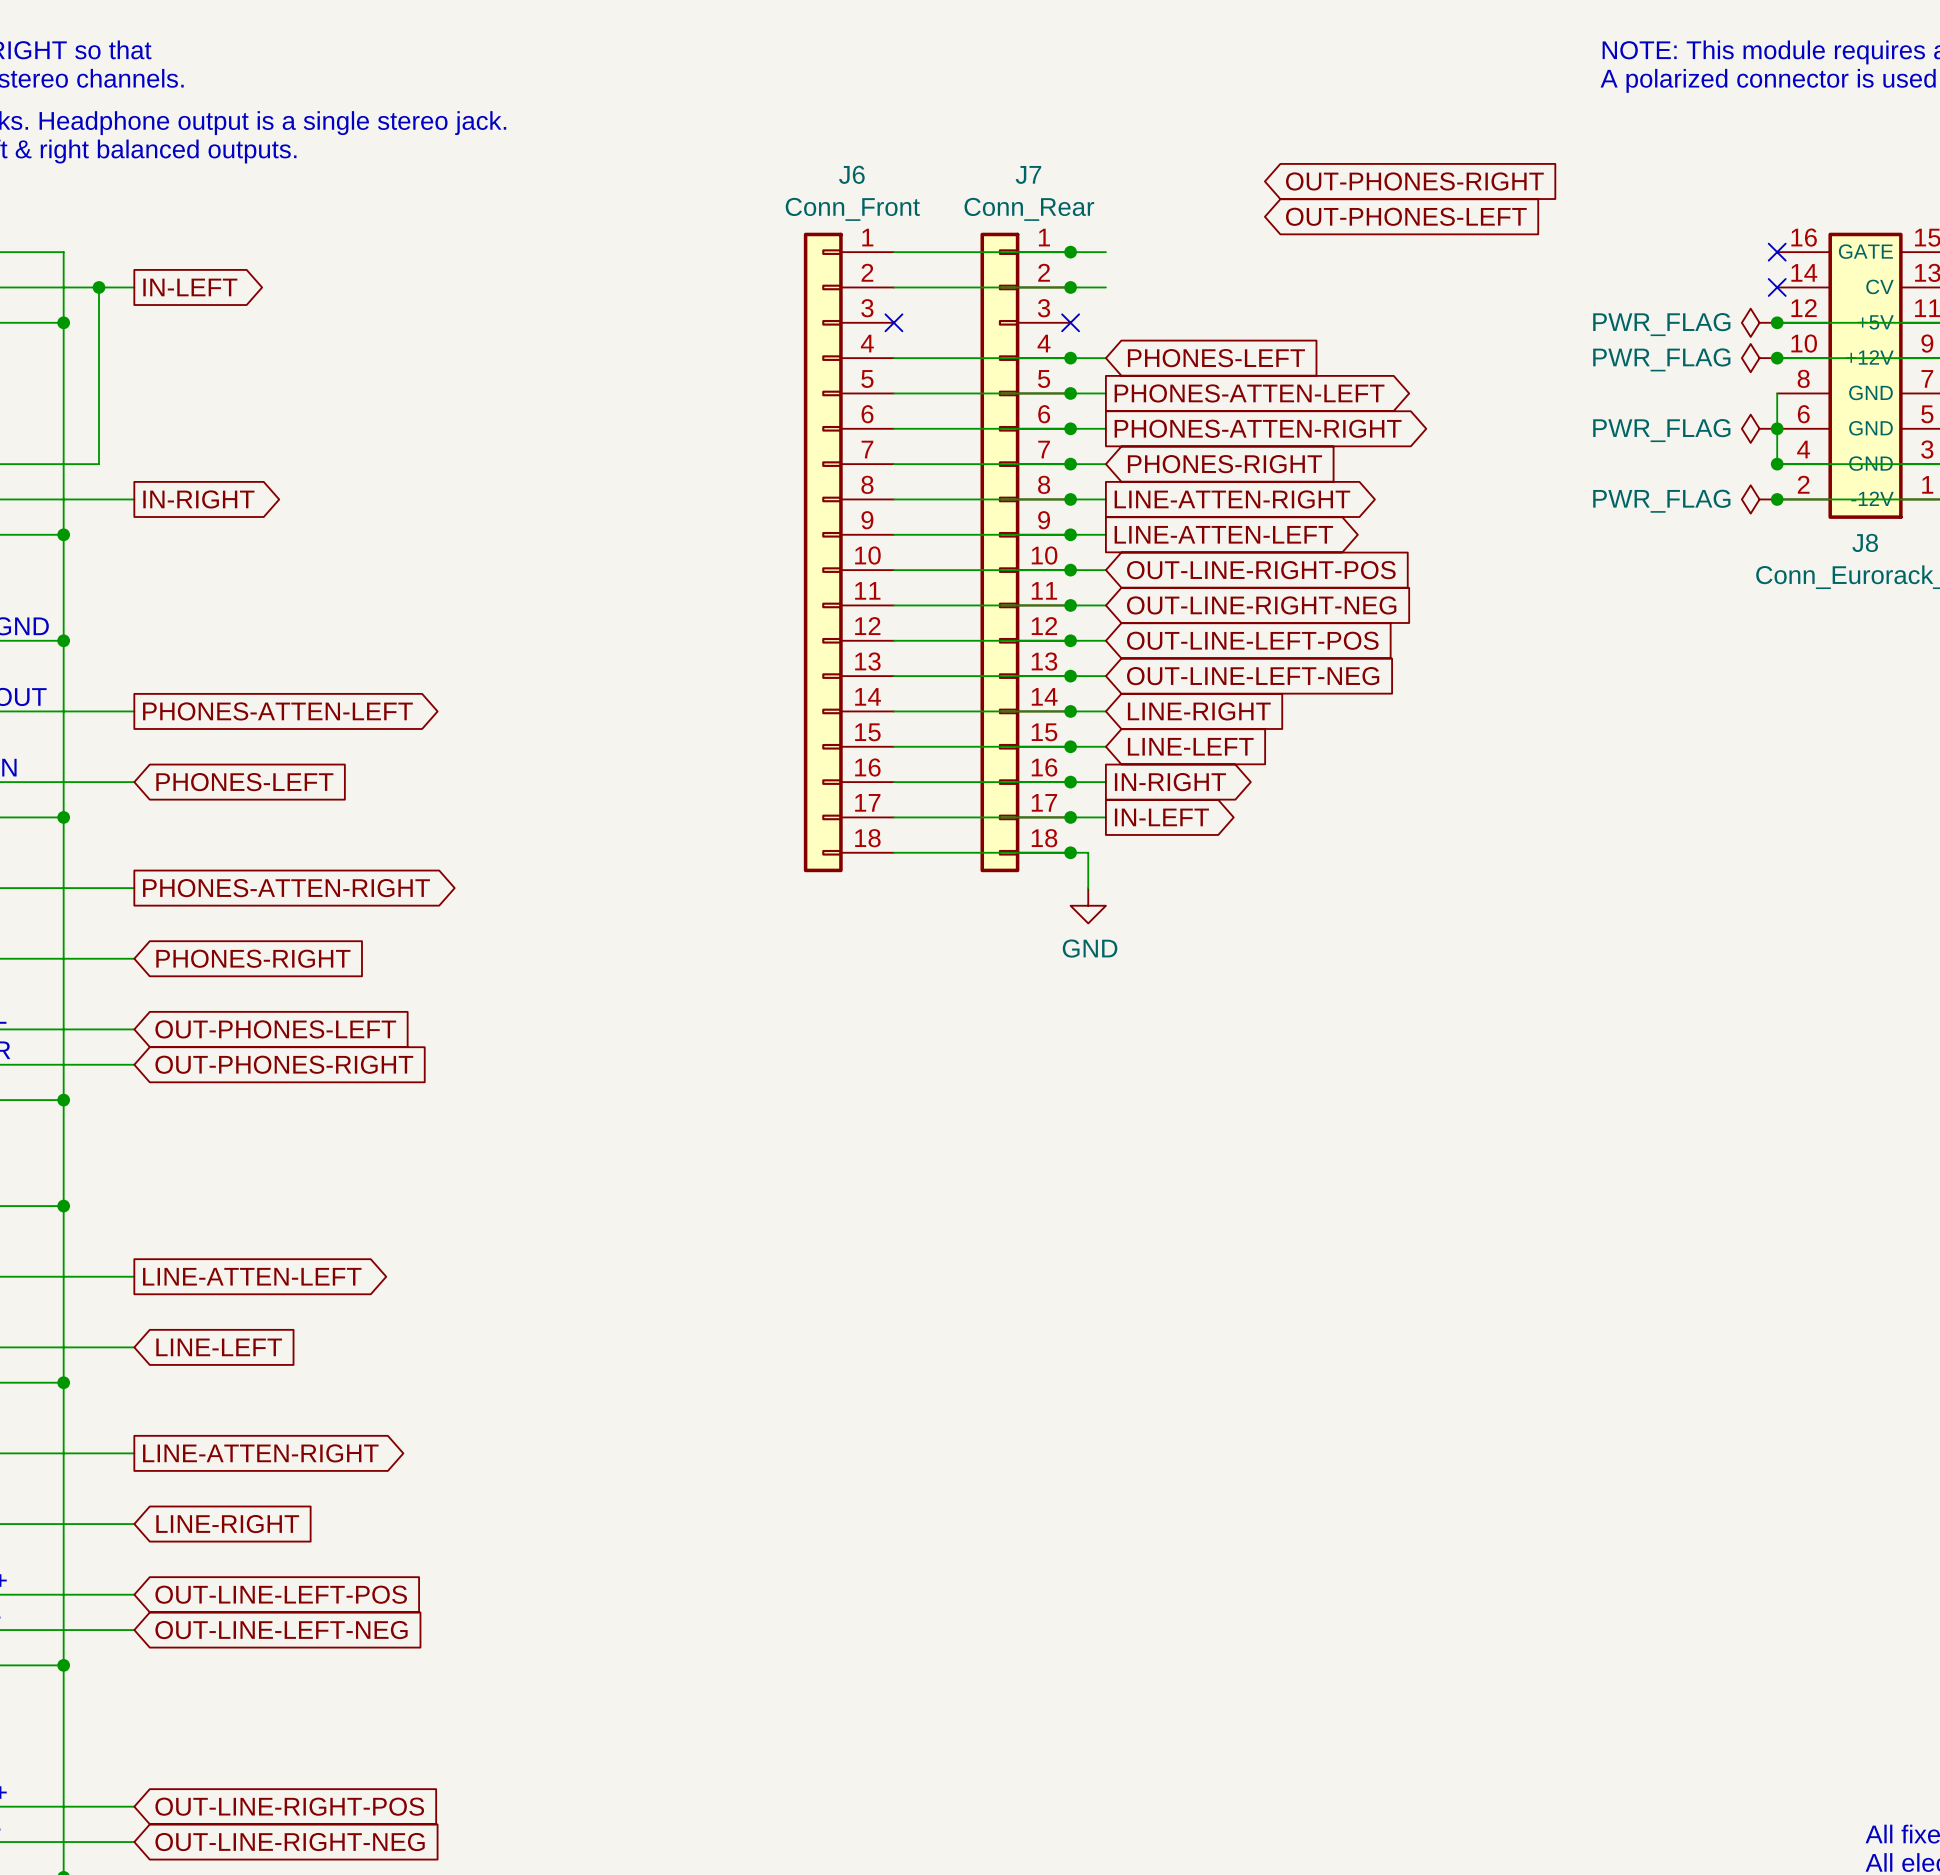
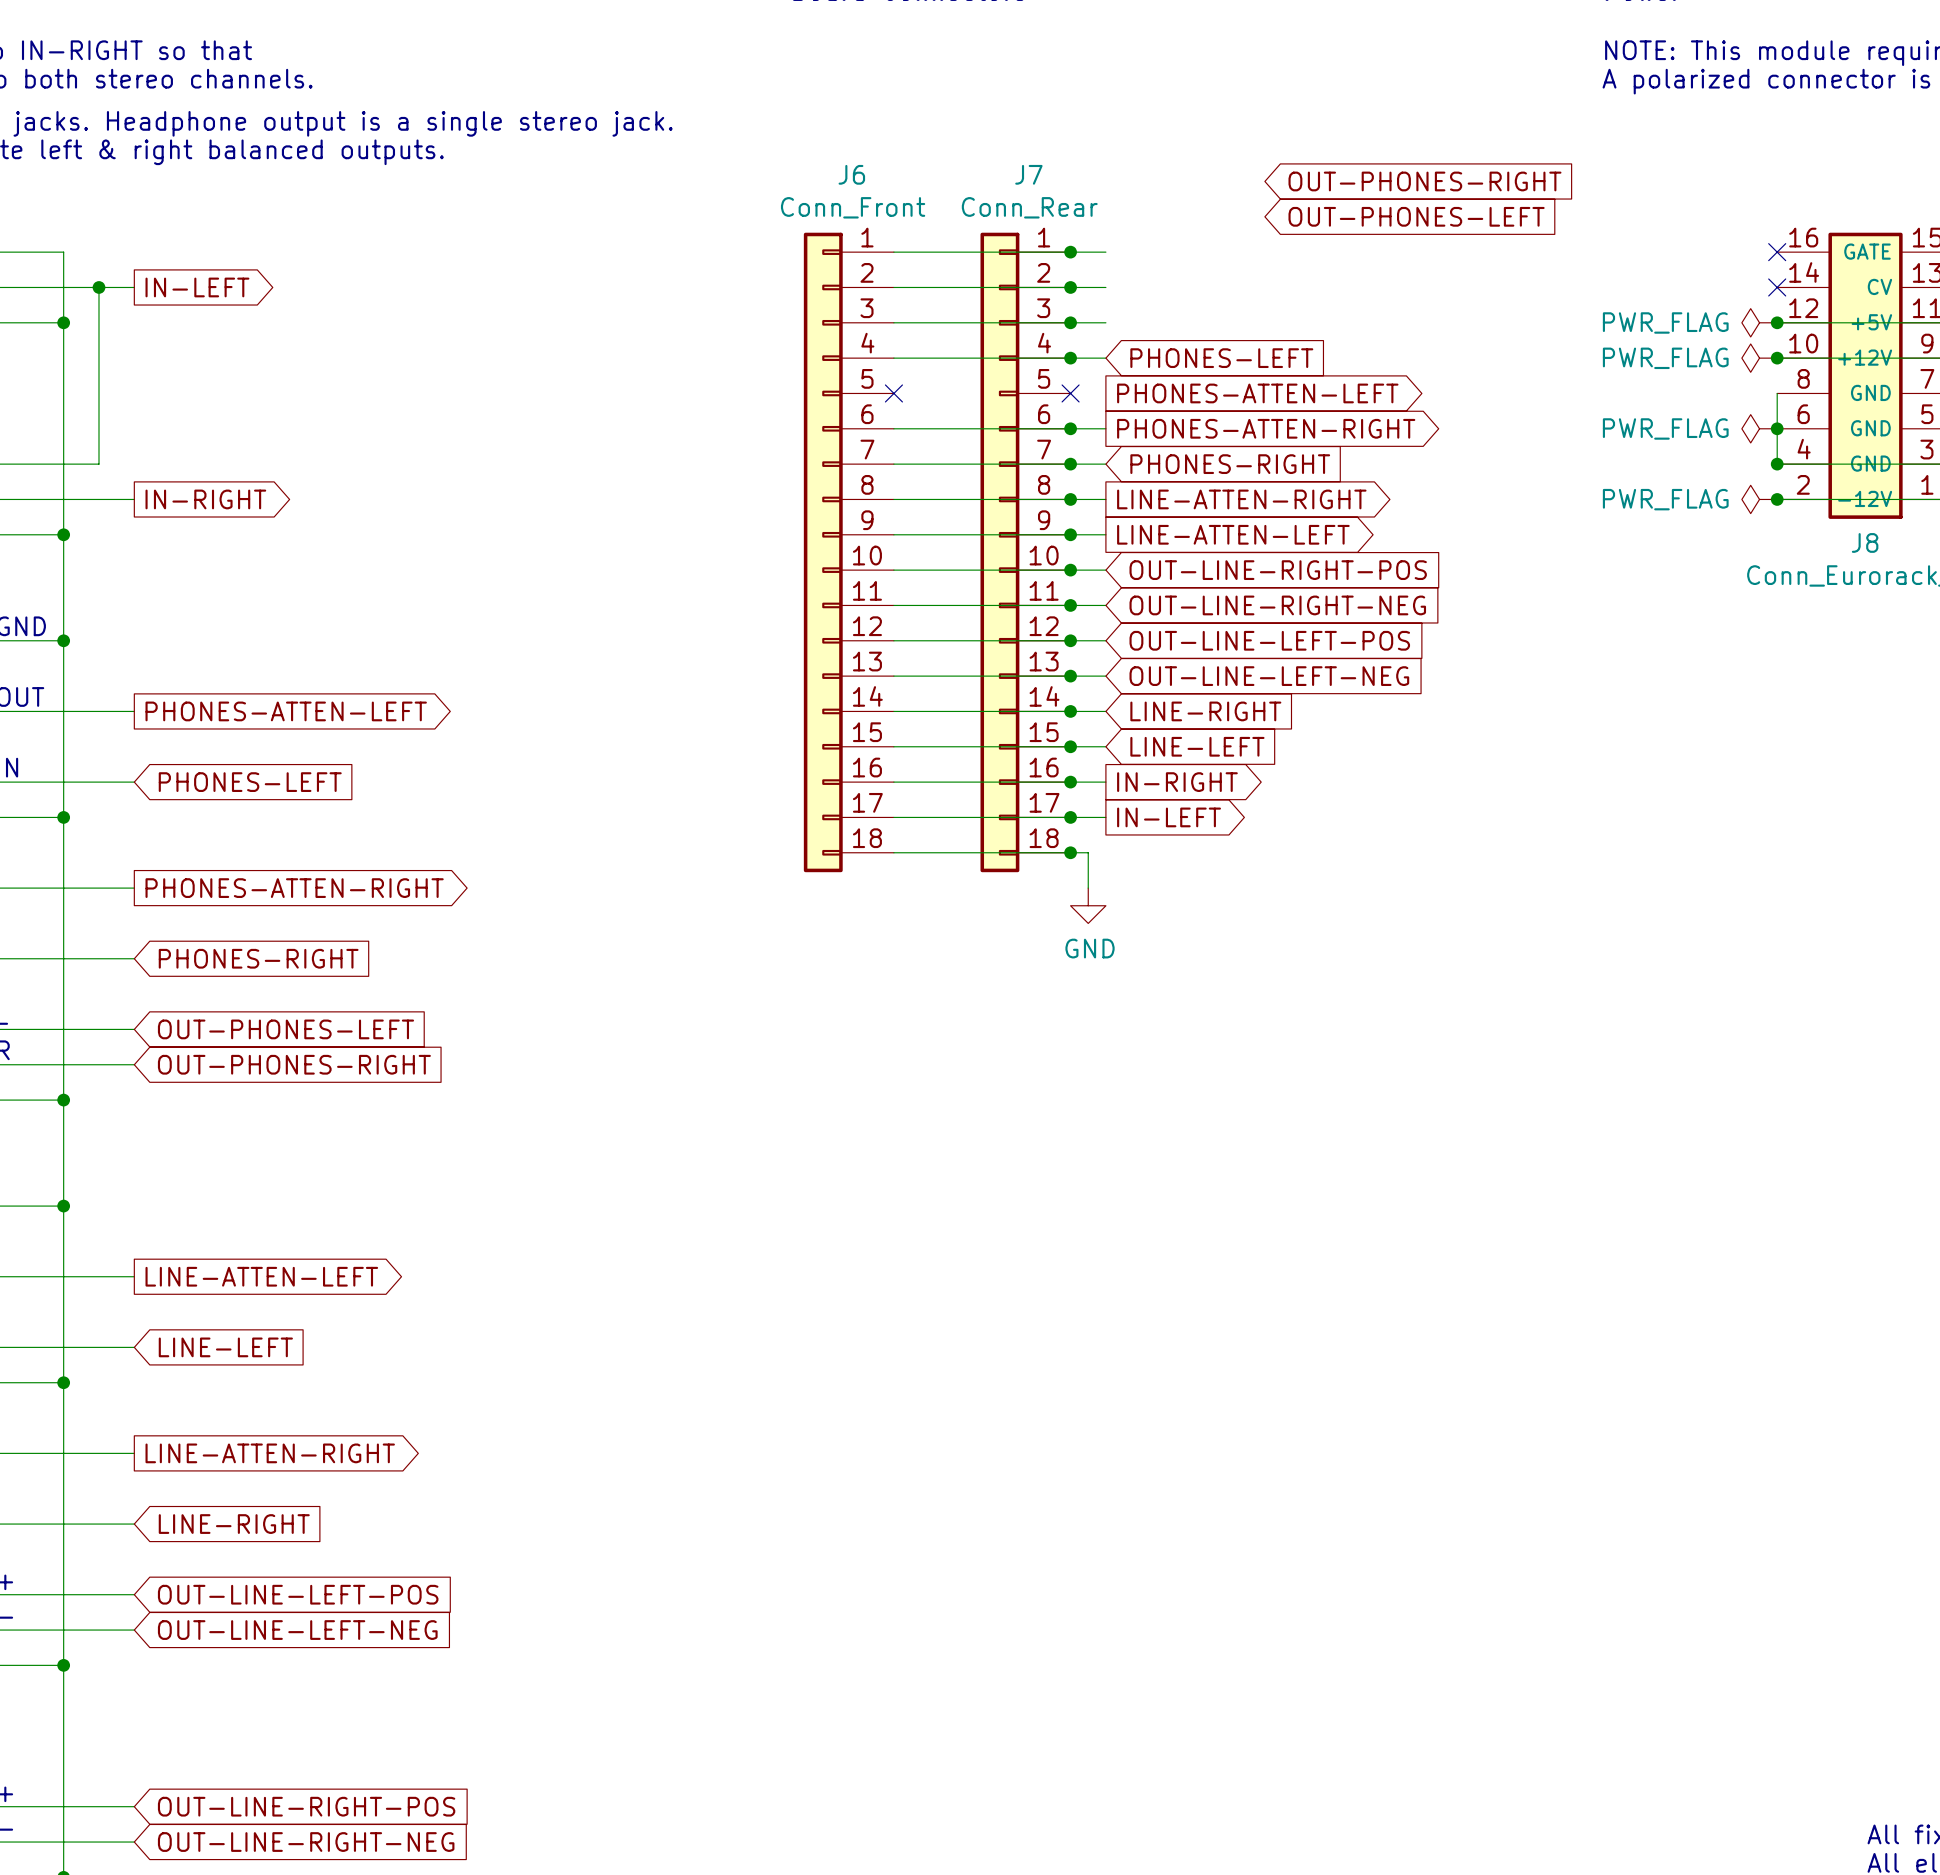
no-connect mark position: (893, 322) -> (893, 393)
no-connect mark position: (1070, 322) -> (1070, 393)
wire: (893, 393) (1105, 393) -> (893, 322) (1105, 322)
junction position: (1070, 393) -> (1070, 322)

